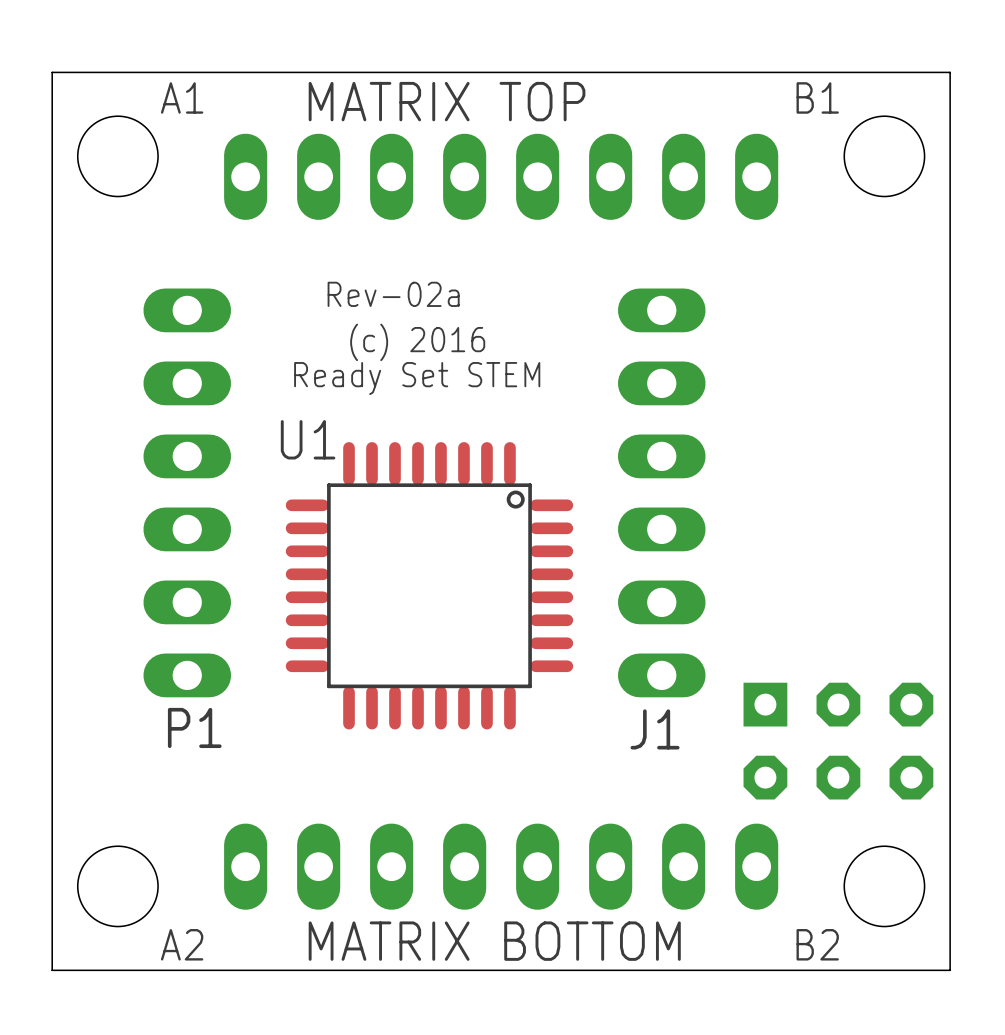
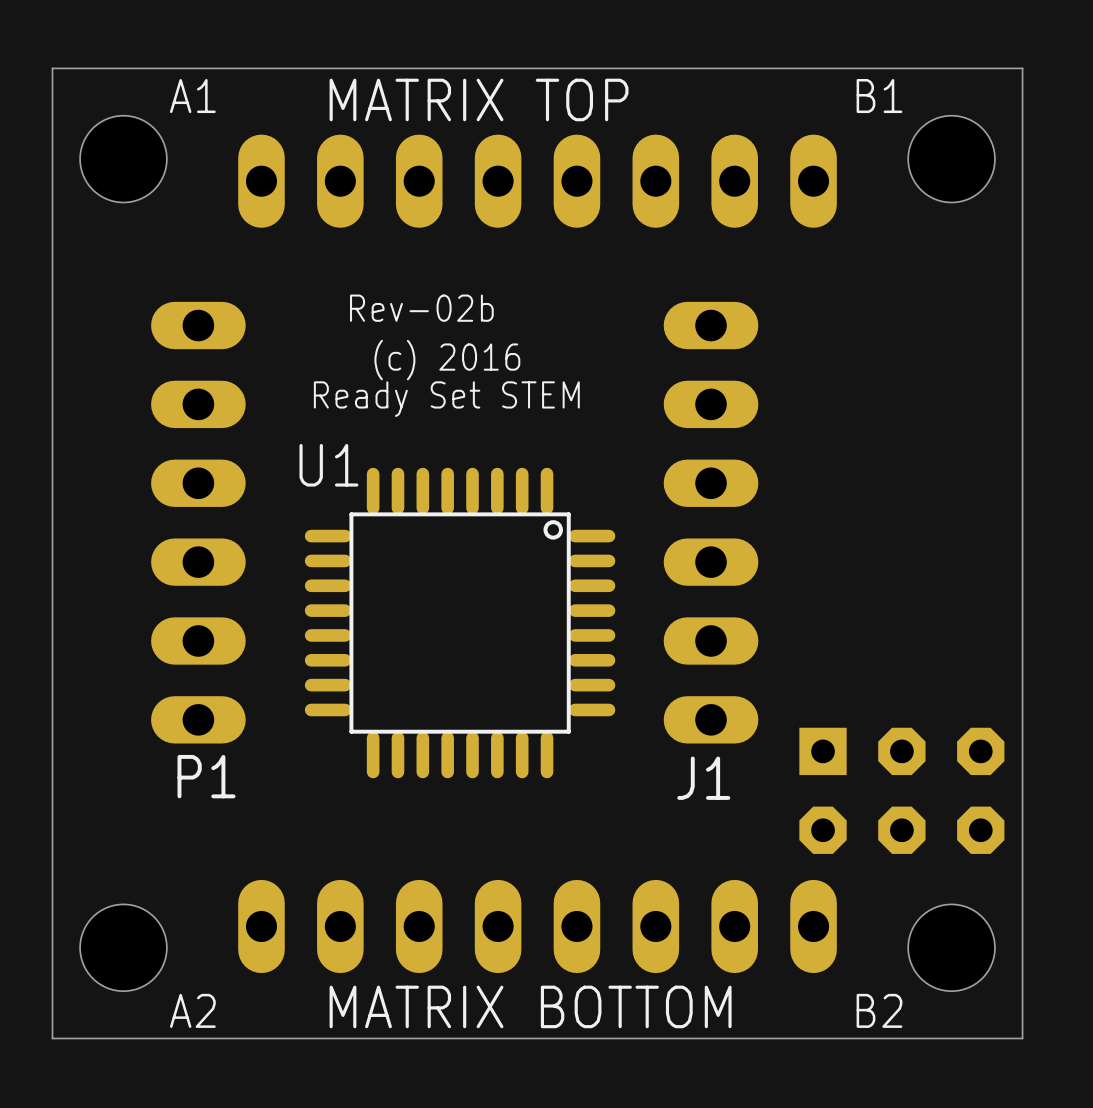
text: Rev-02a (393, 294) -> Rev-02b (421, 308)

